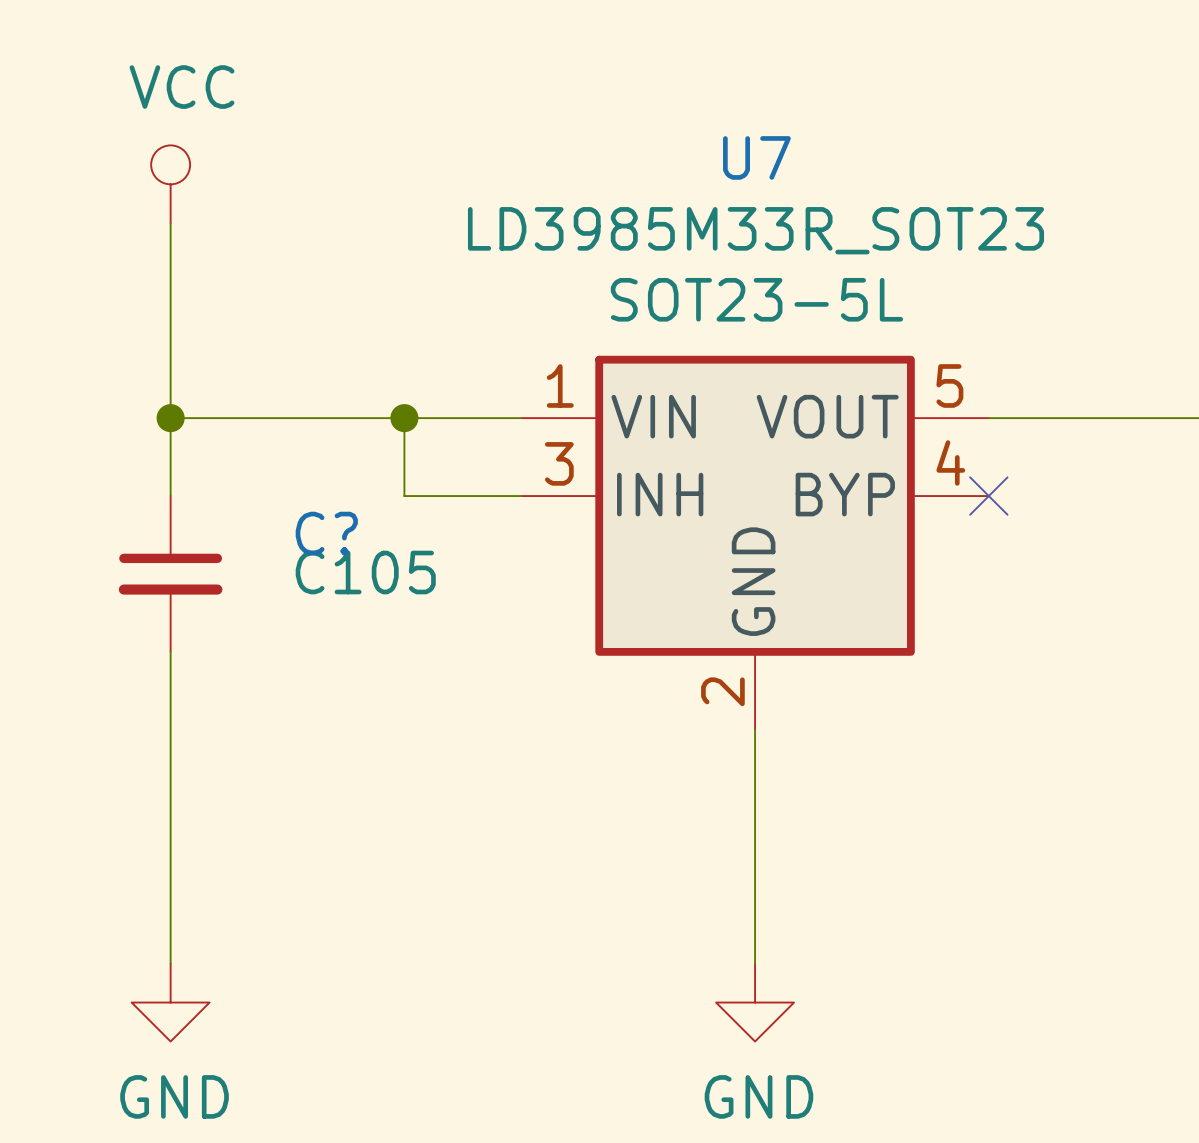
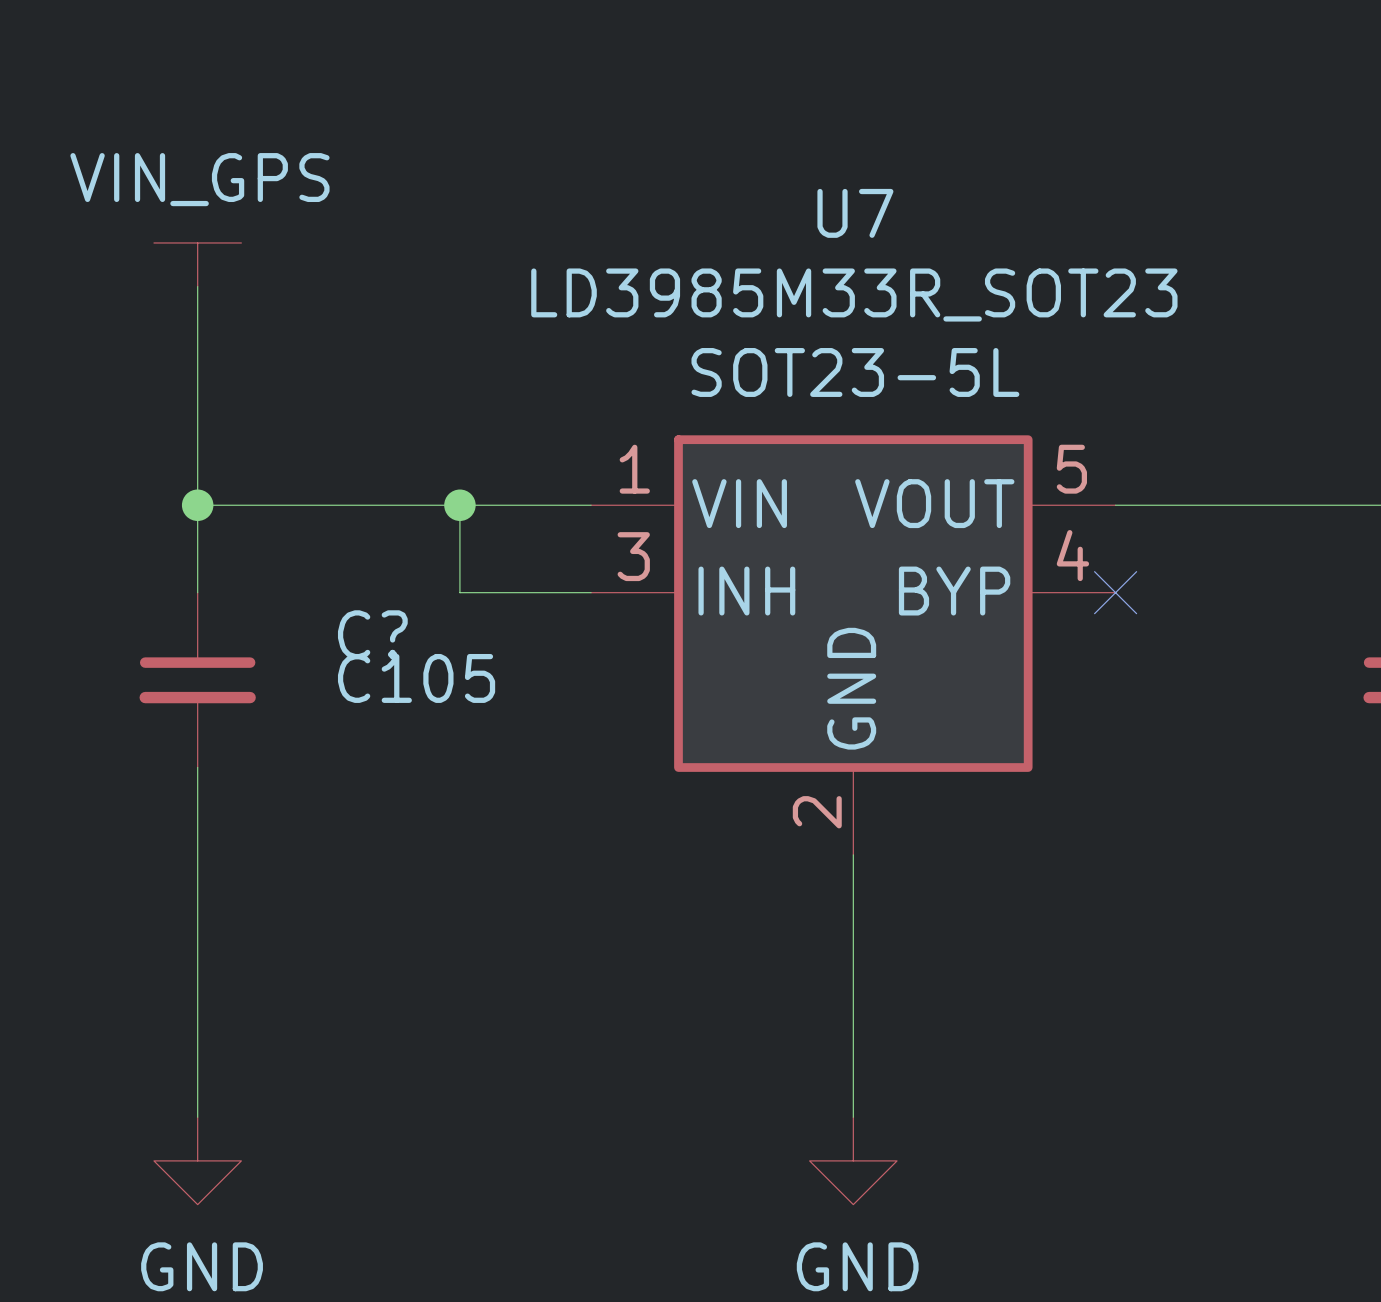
power symbol: VCC (170, 184) -> VIN_GPS (197, 264)

